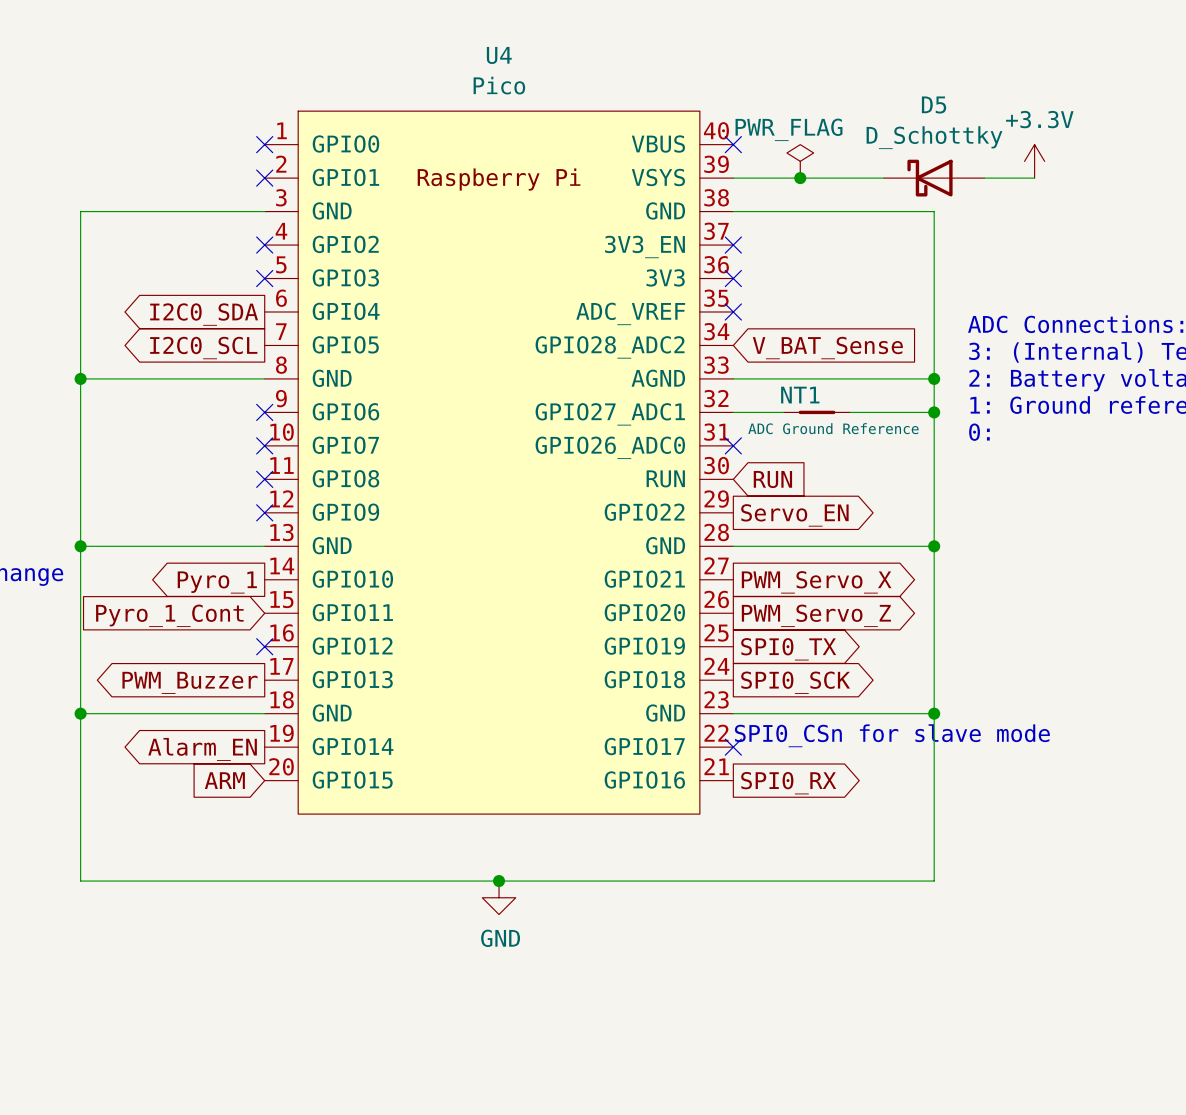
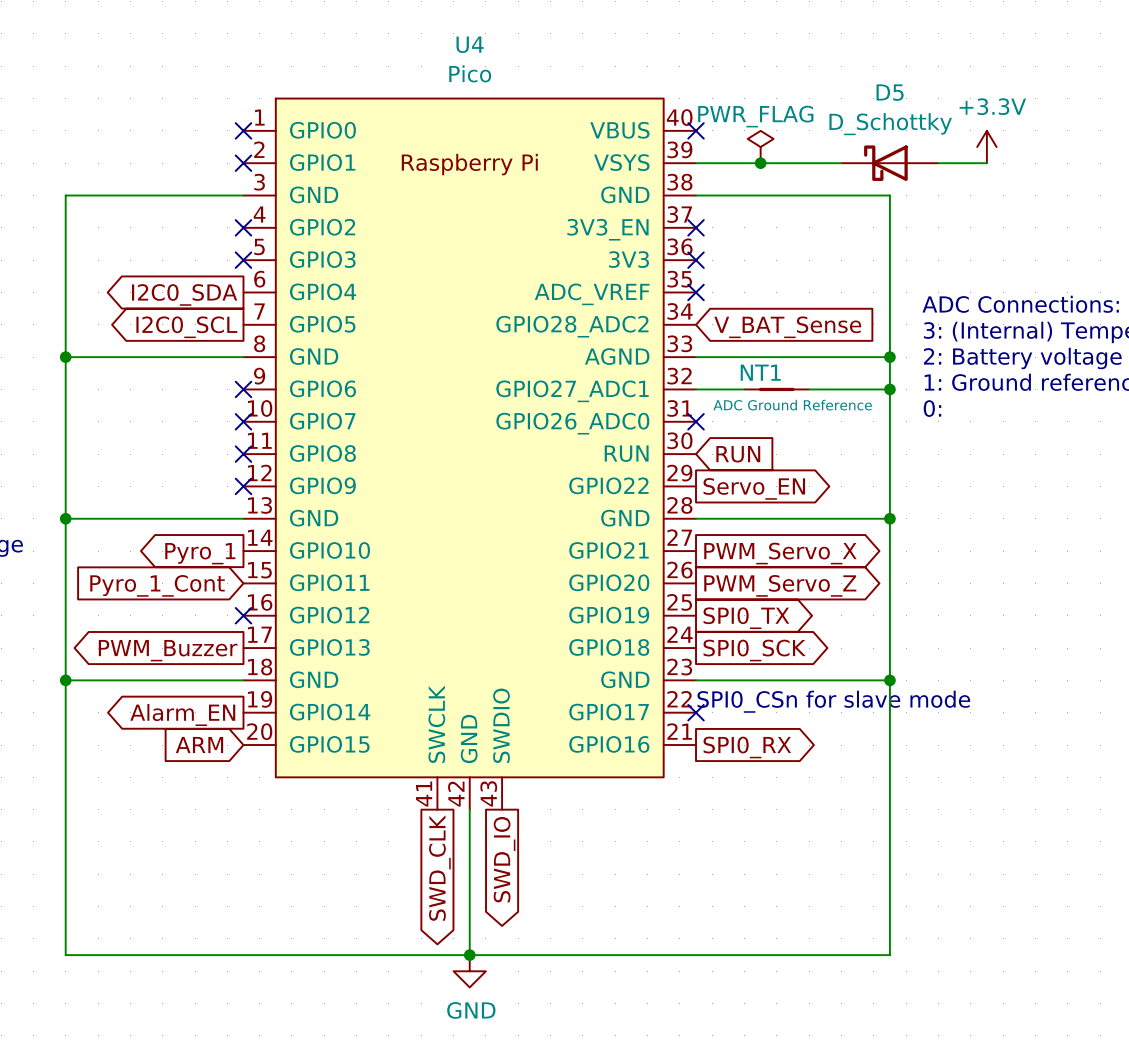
U4 symbol: [264, 111, 734, 815] -> [243, 98, 697, 810]
wire: none -> (469, 809) (469, 955)
wire: (80, 881) (934, 881) -> (65, 841) (65, 955) (889, 955) (889, 841)
junction: (499, 881) -> none
global label: none -> SWD_IO (504, 859)
power symbol position: GND (499, 897) -> GND (469, 971)
global label: none -> SWD_CLK (439, 868)
junction: none -> (469, 955)

